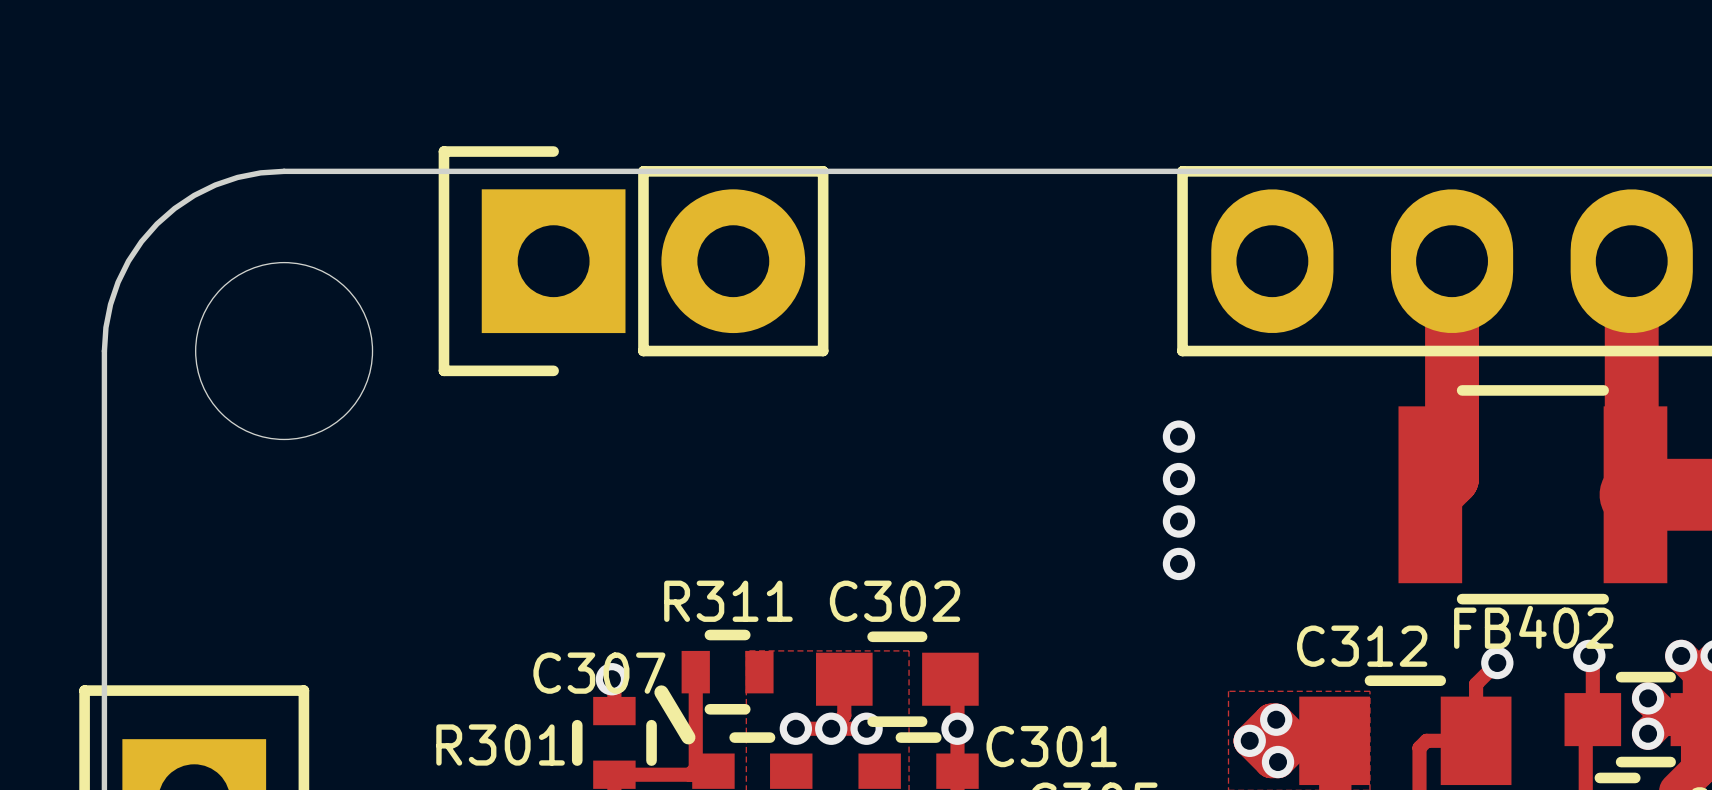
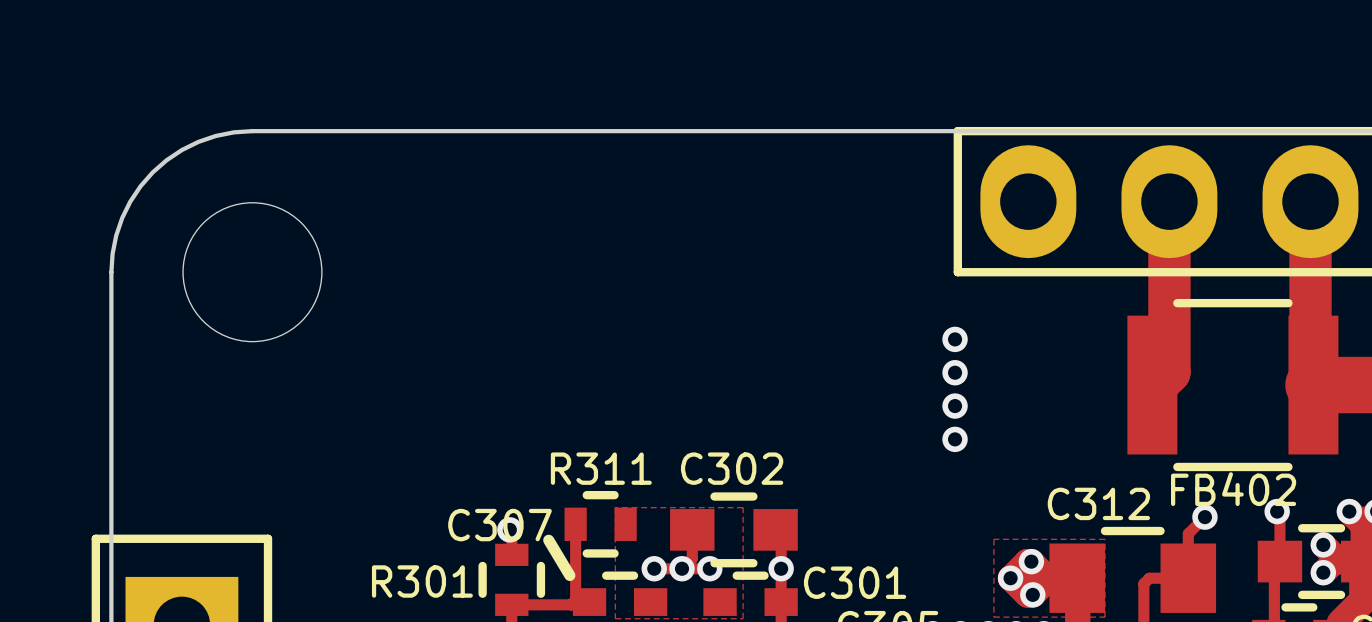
part: (633, 261) -> none

